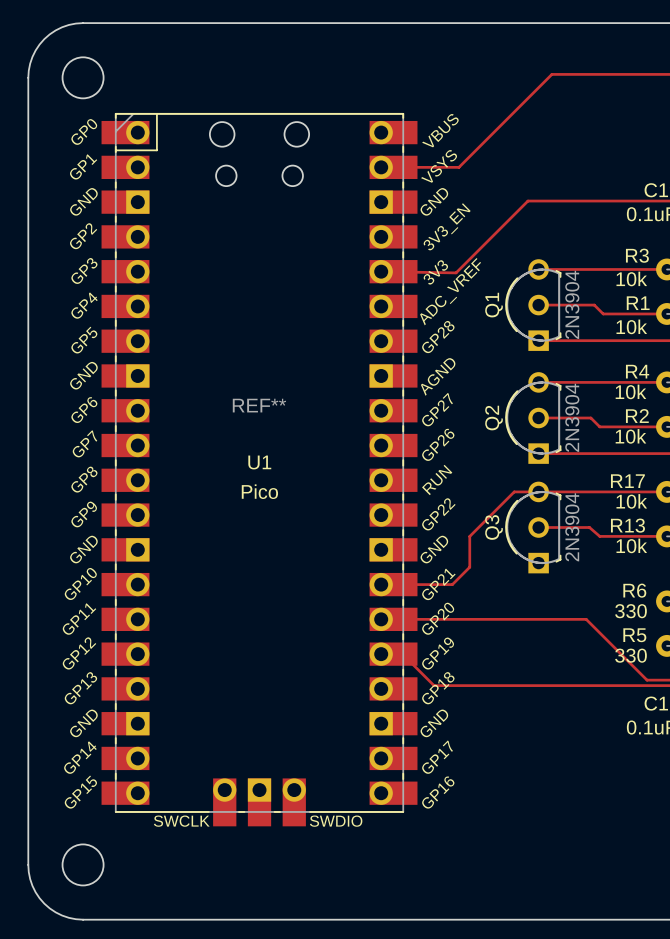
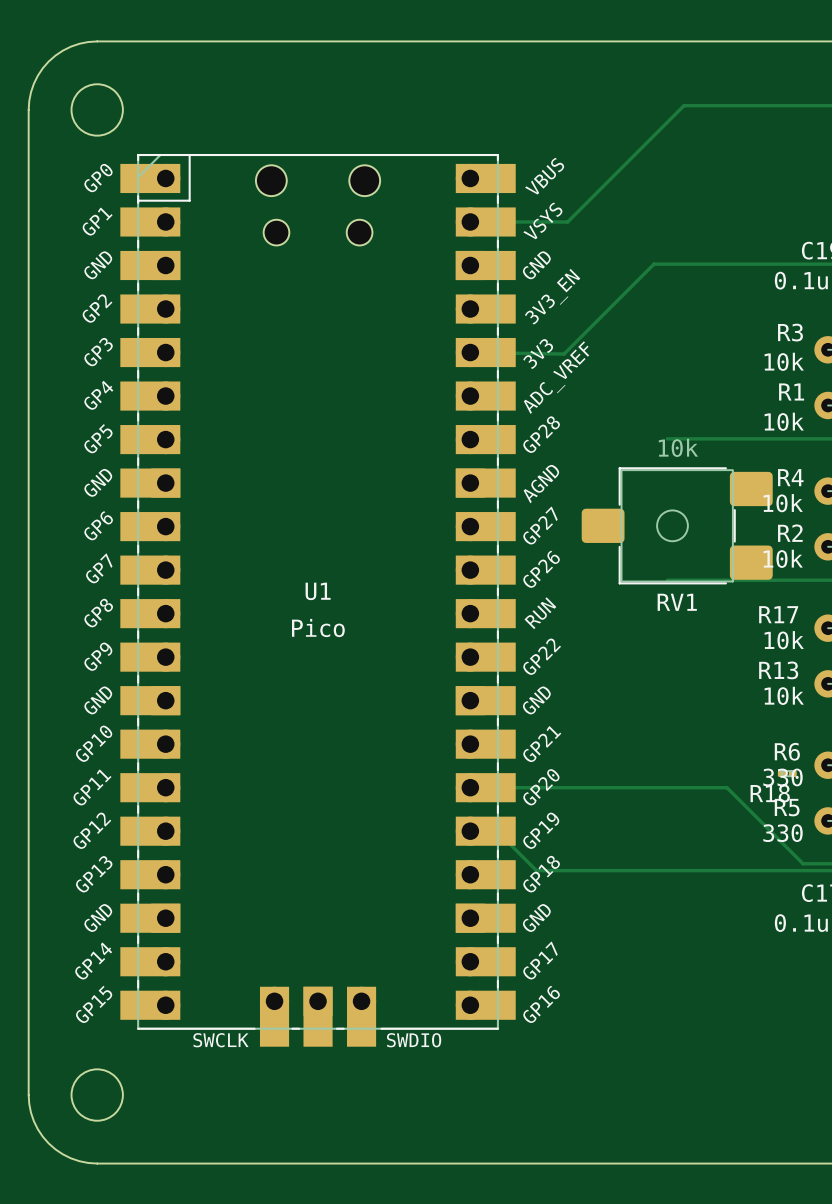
track: (538, 269) (667, 269) -> none
Q1: 2N3904 (533, 305) -> none
track: (538, 305) (594, 305) (603, 313) (667, 313) -> none
track: (538, 382) (667, 382) -> none
REF**: (259, 405) -> none
RV1: none -> 10k (677, 525)
Q2: 2N3904 (533, 418) -> none
track: (538, 418) (590, 418) (599, 426) (667, 426) -> none
track: (667, 491) (514, 491) (469, 536) (469, 567) (452, 584) (381, 584) -> none
Q3: 2N3904 (533, 527) -> none
track: (538, 527) (589, 527) (599, 536) (667, 536) -> none
R18: none -> (787, 773)

